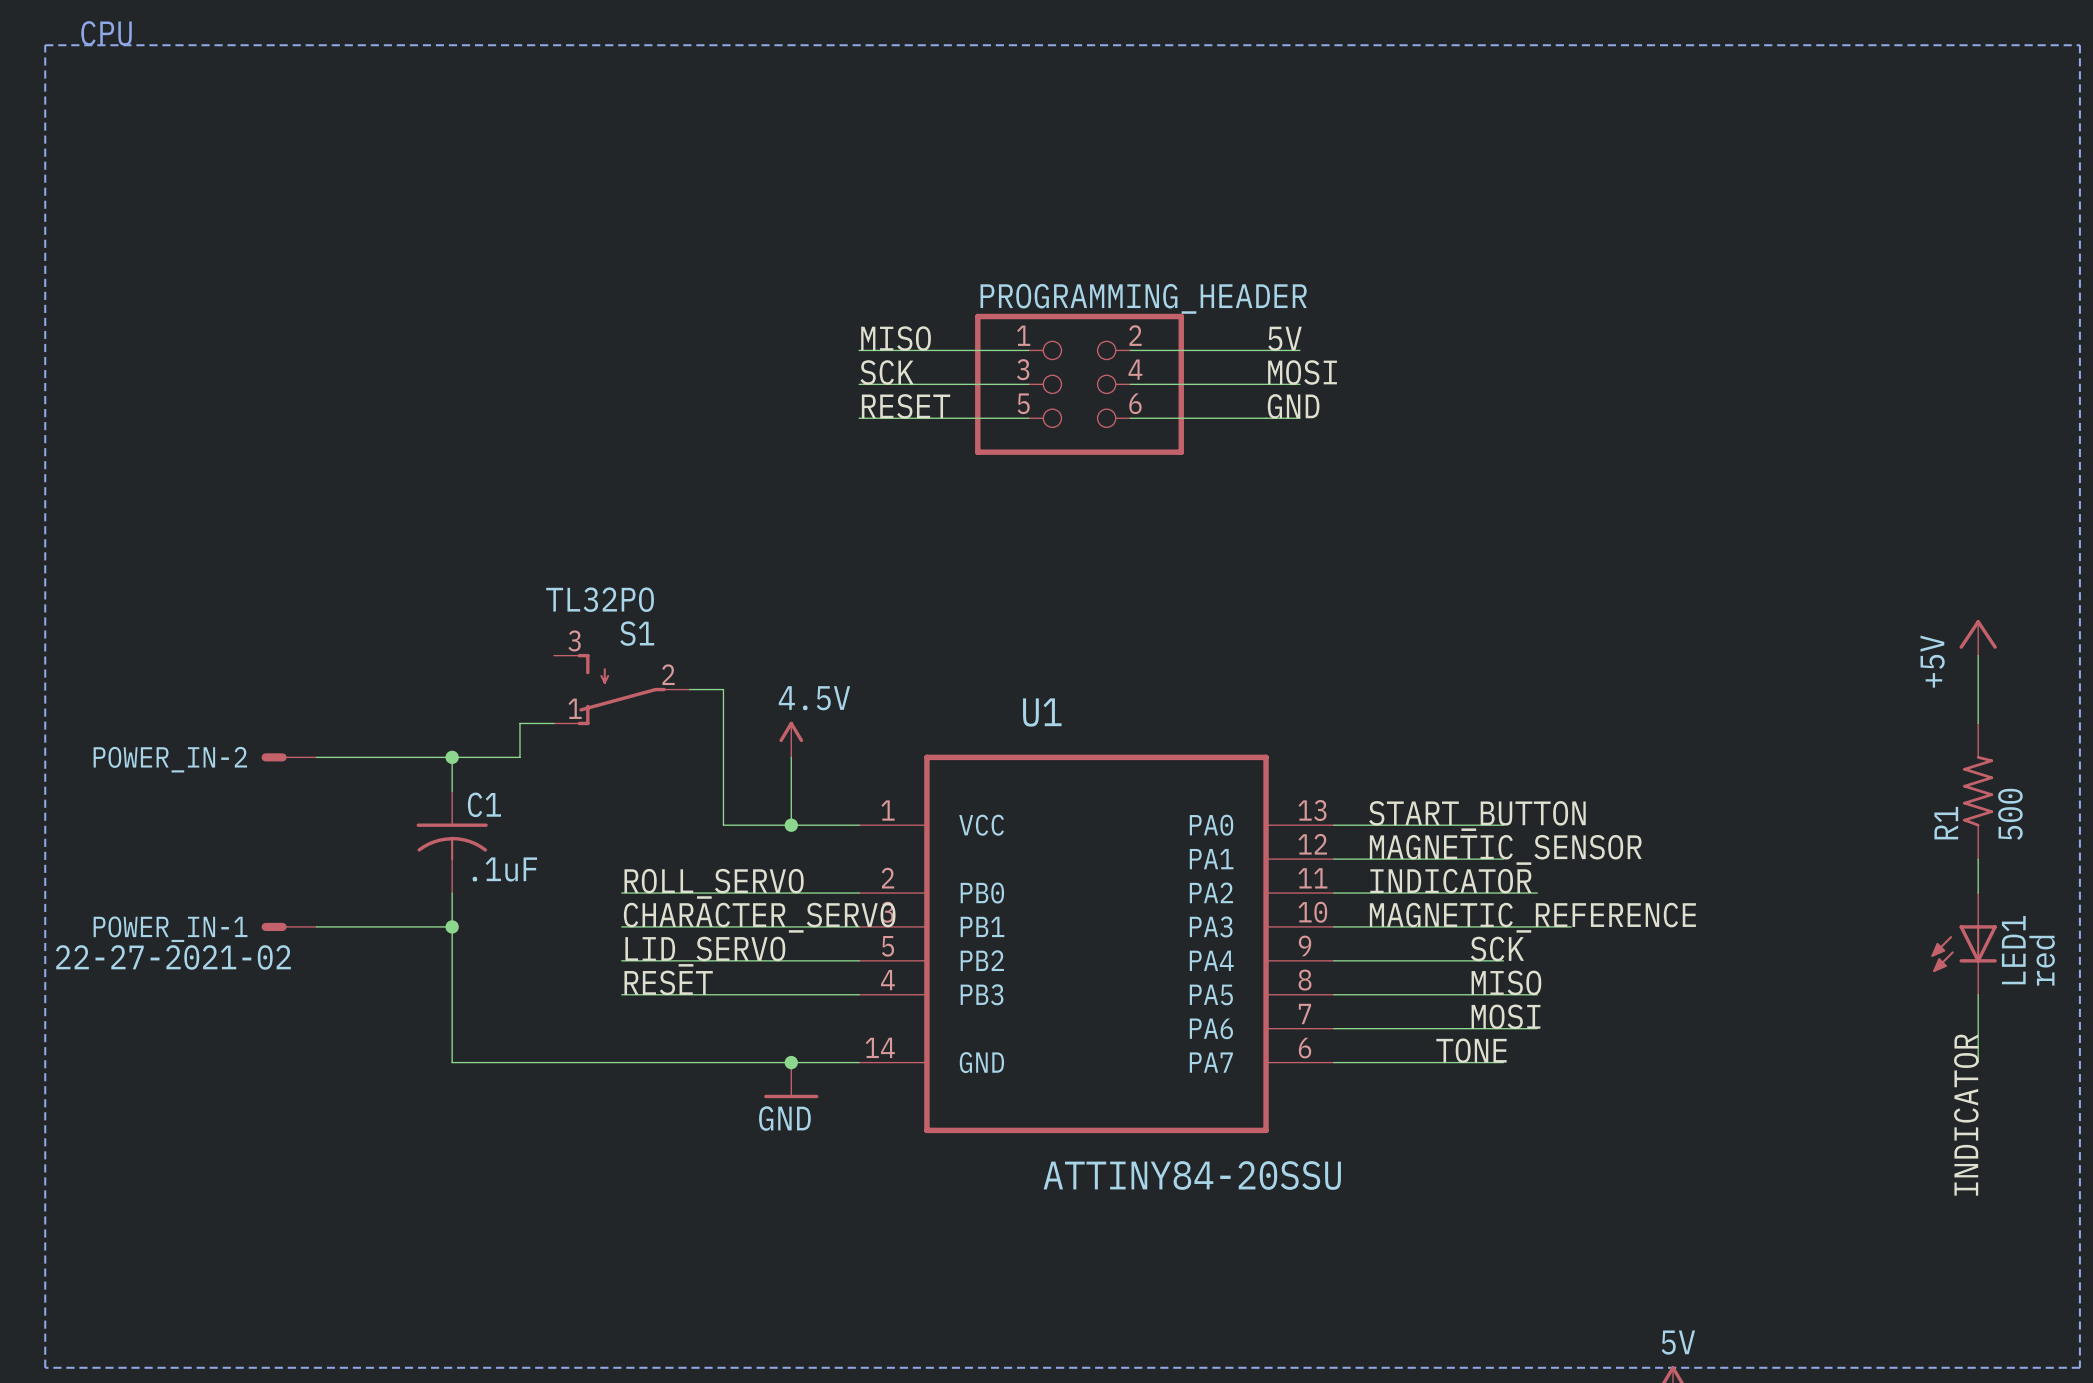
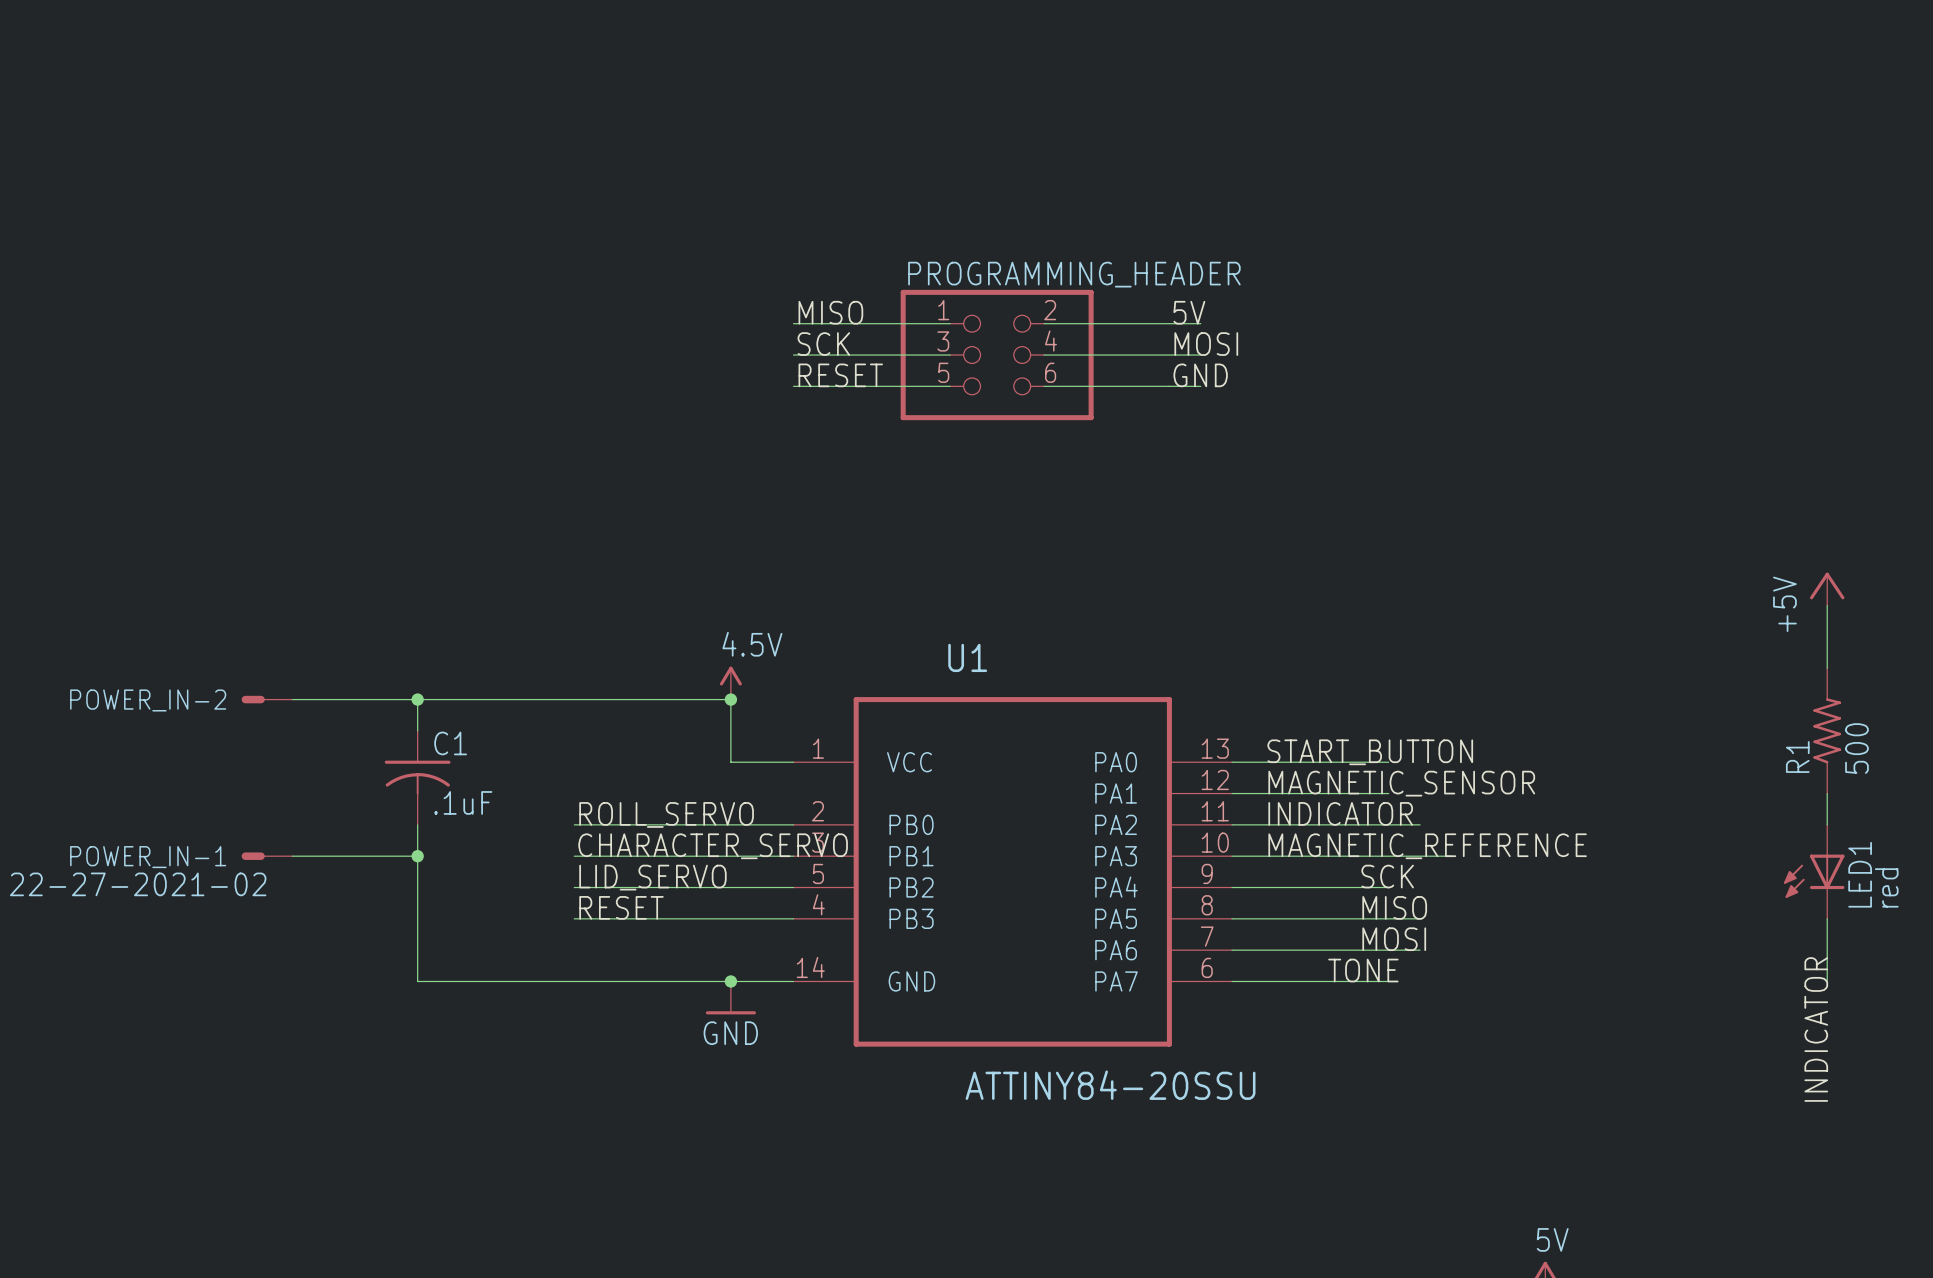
text: CPU (106, 33) -> none
line: (45, 45) (2079, 45) (2079, 1367) (45, 1367) (45, 45) -> none
S1: TL32PO (621, 689) -> none
wire: (689, 689) (723, 689) (723, 825) (791, 825) -> none
wire: (553, 723) (519, 723) (519, 757) -> (730, 699) (480, 699)
junction position: (791, 825) -> (730, 699)

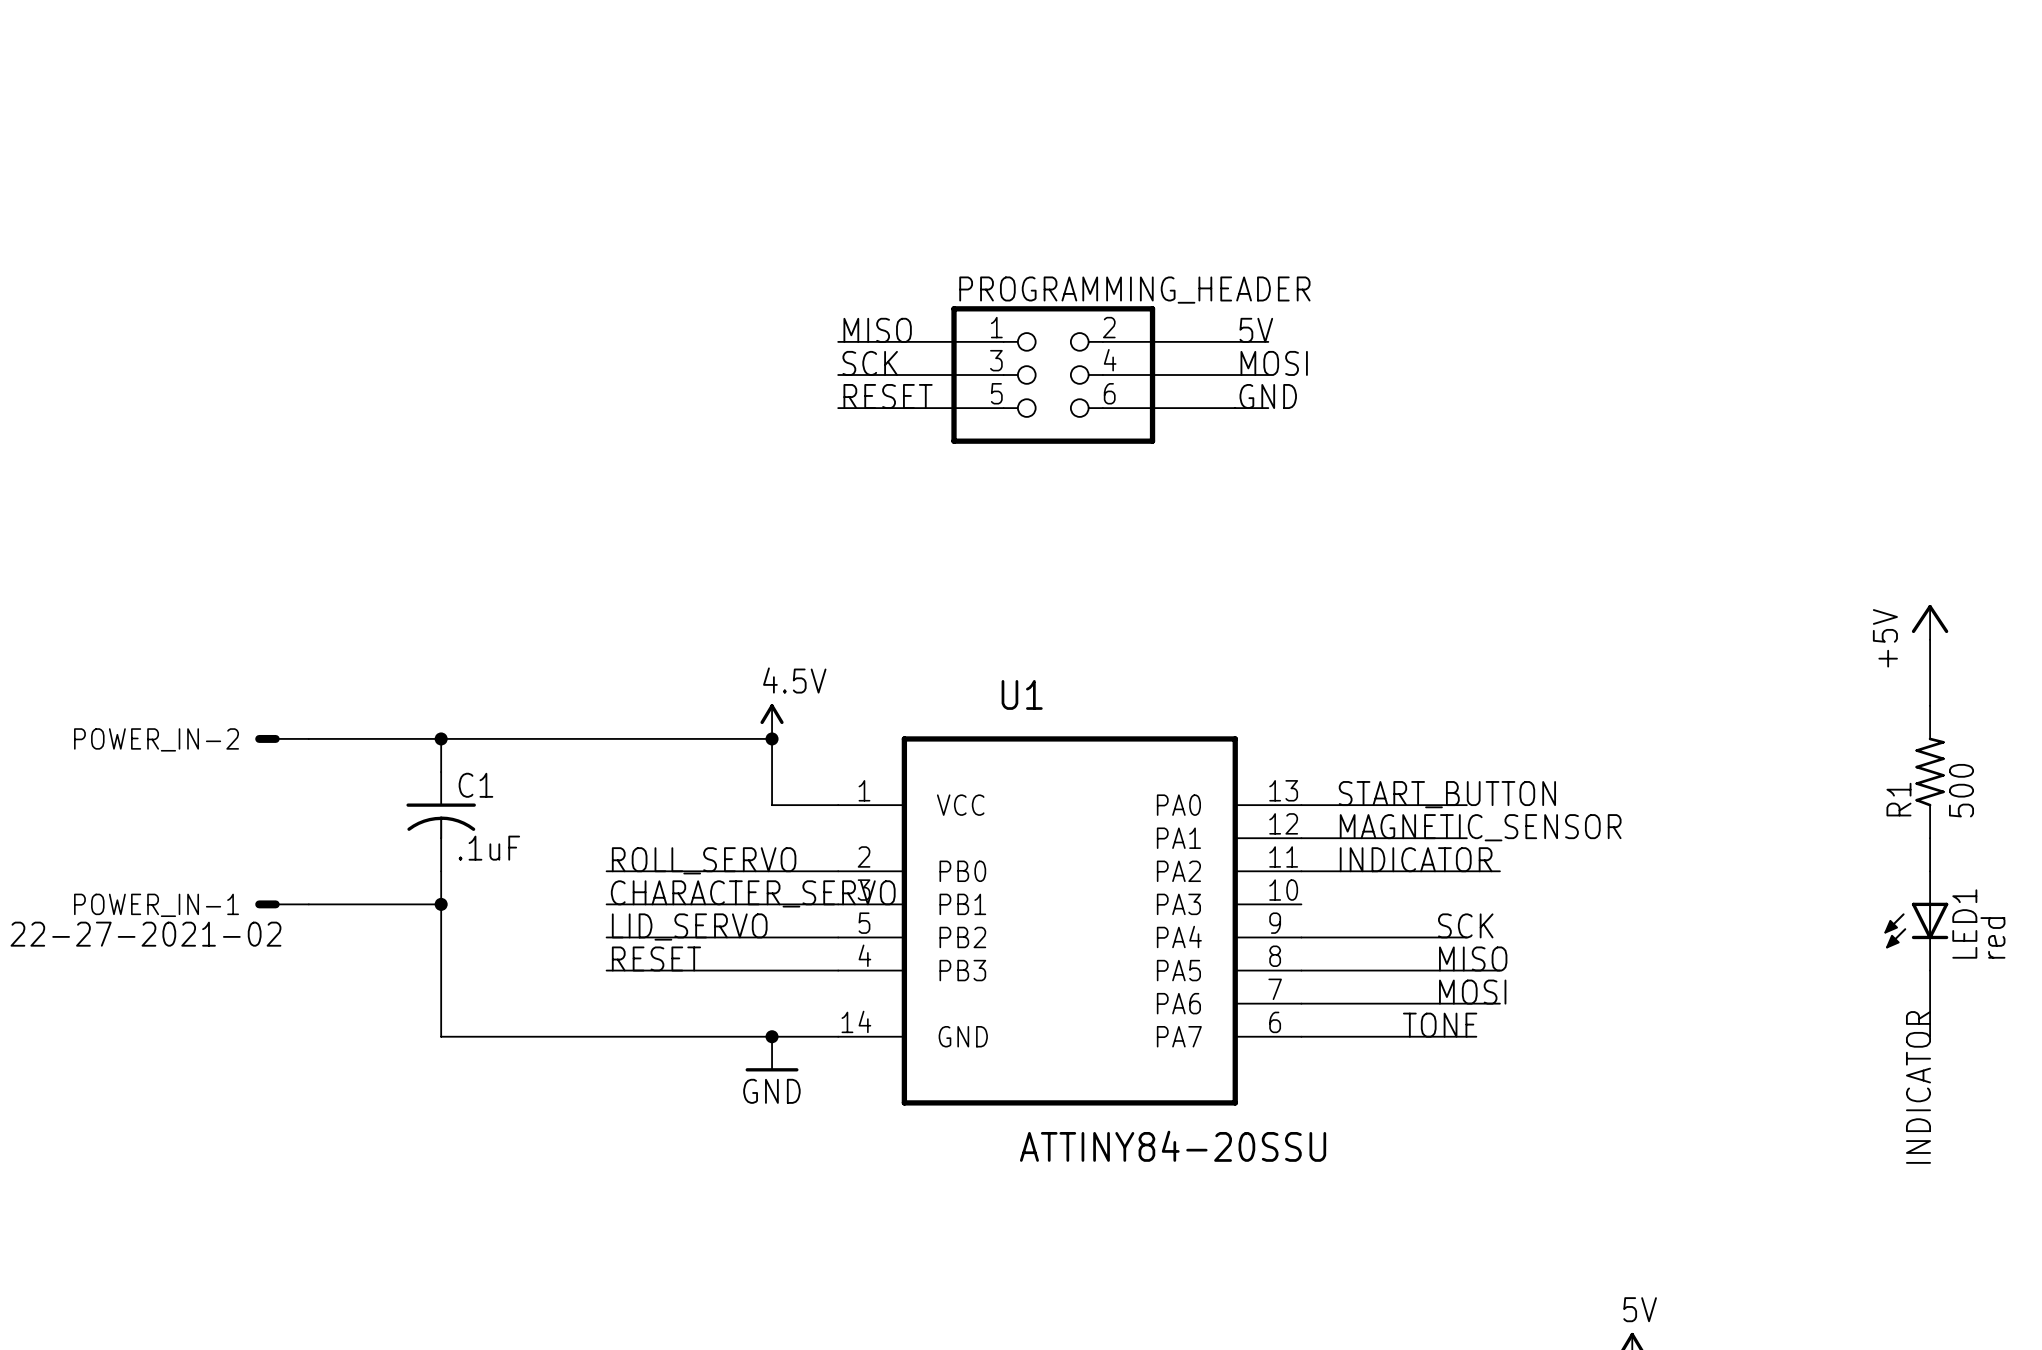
label: MAGNETIC_REFERENCE (1427, 846) -> none
wire: (1232, 856) (1451, 856) -> none

